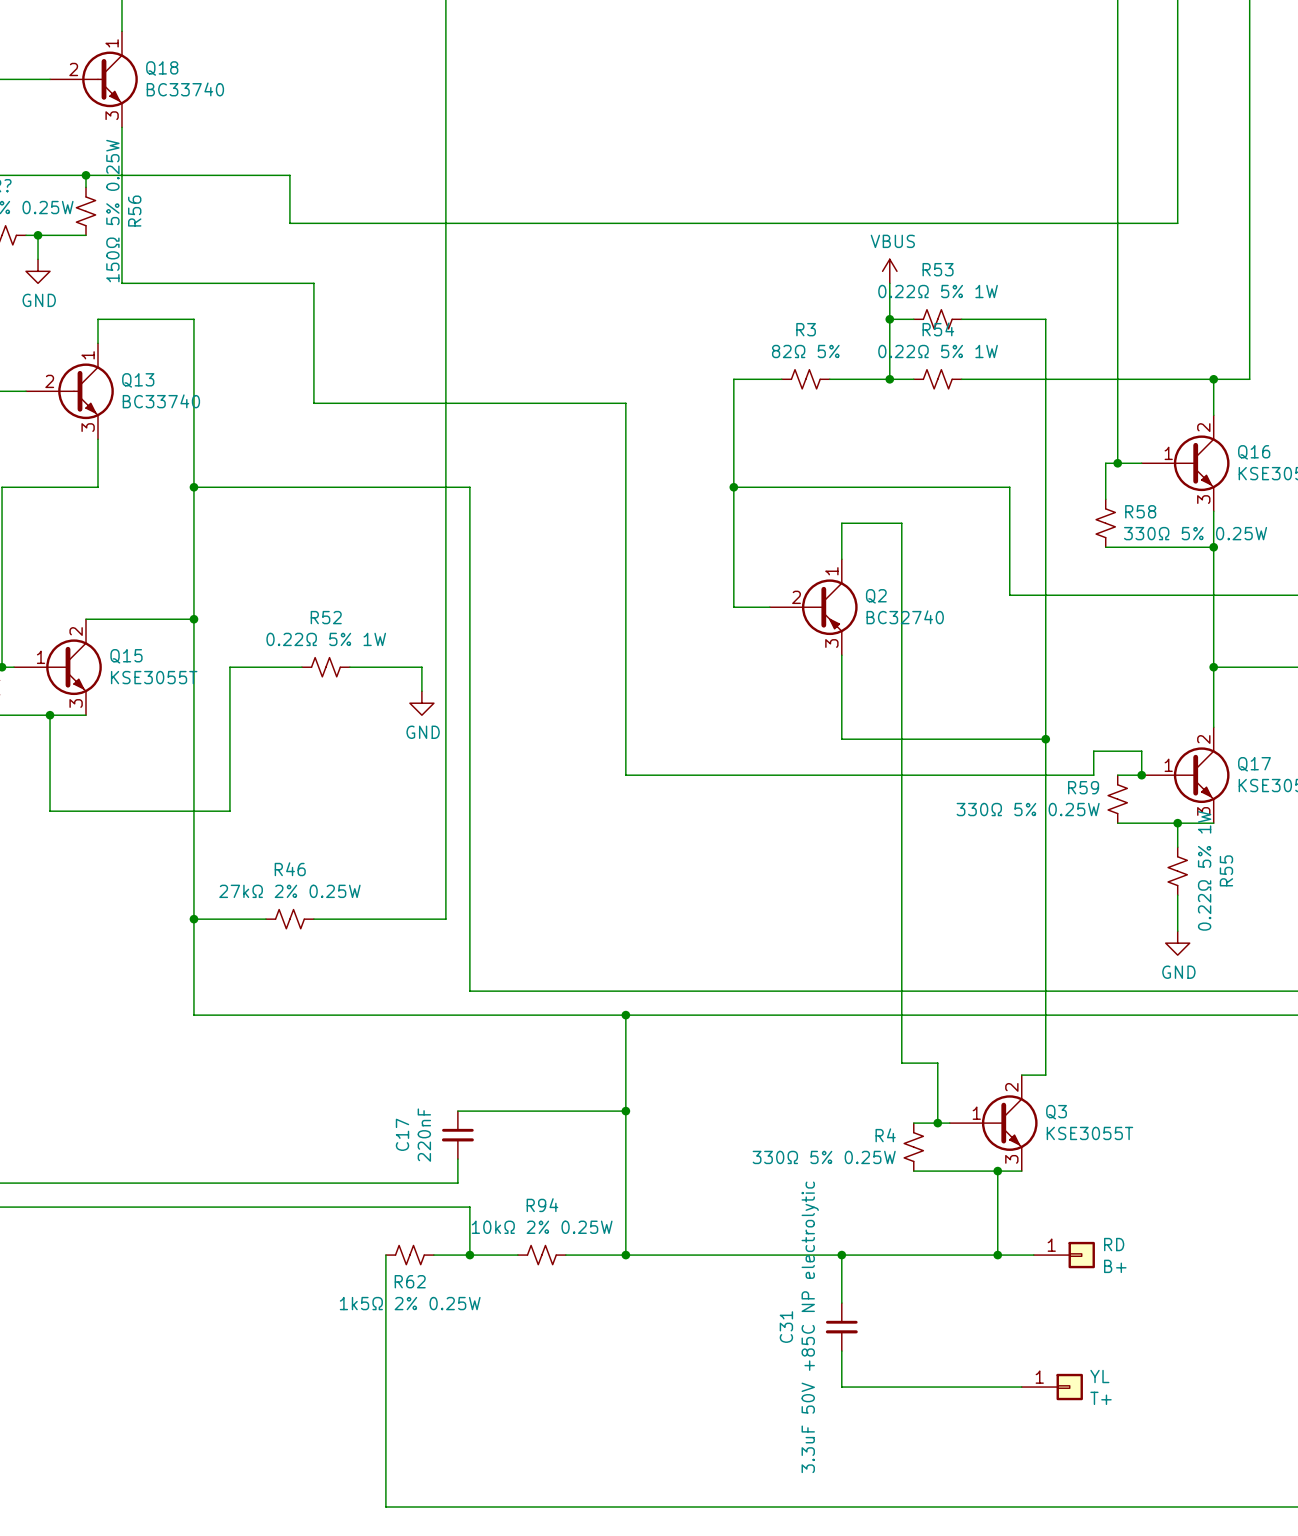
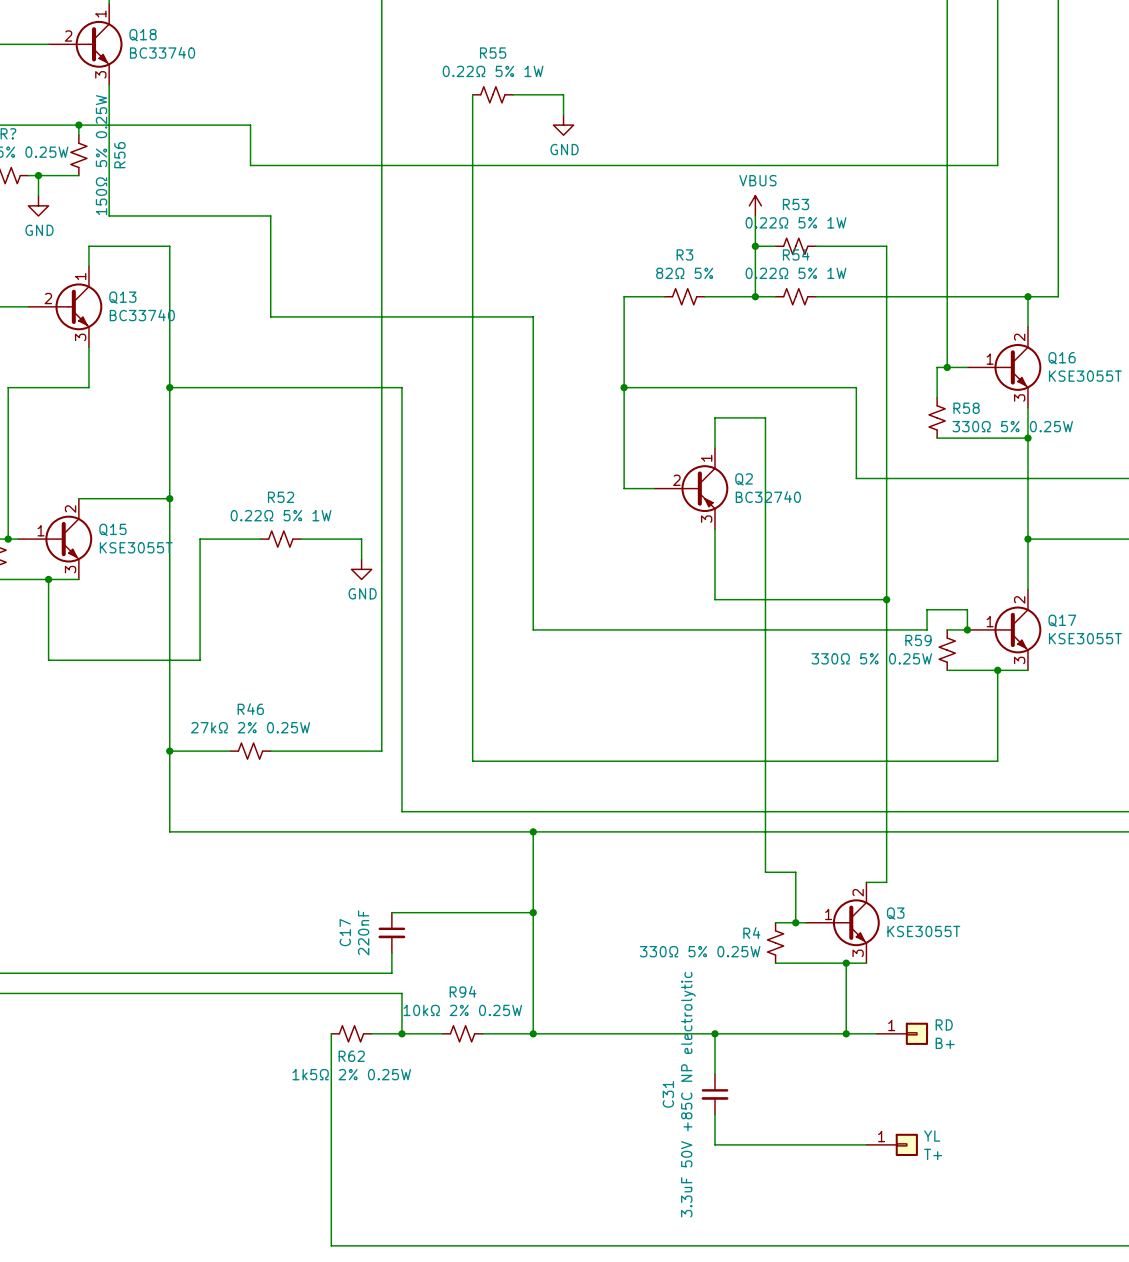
wire: none -> (472, 94) (472, 761) (997, 761)
wire: none -> (513, 94) (563, 94) (563, 115)
power symbol: none -> GND (563, 125)
R55 value position: 0.22Ω 5% 1W (1204, 870) -> 0.22Ω 5% 1W (493, 71)
R55 name position: R55 (1226, 870) -> R55 (493, 53)
R55 rotation: 0° (1177, 871) -> 90° clockwise (492, 94)
R55 position: (1177, 871) -> (492, 94)
power symbol: GND (1177, 943) -> none

